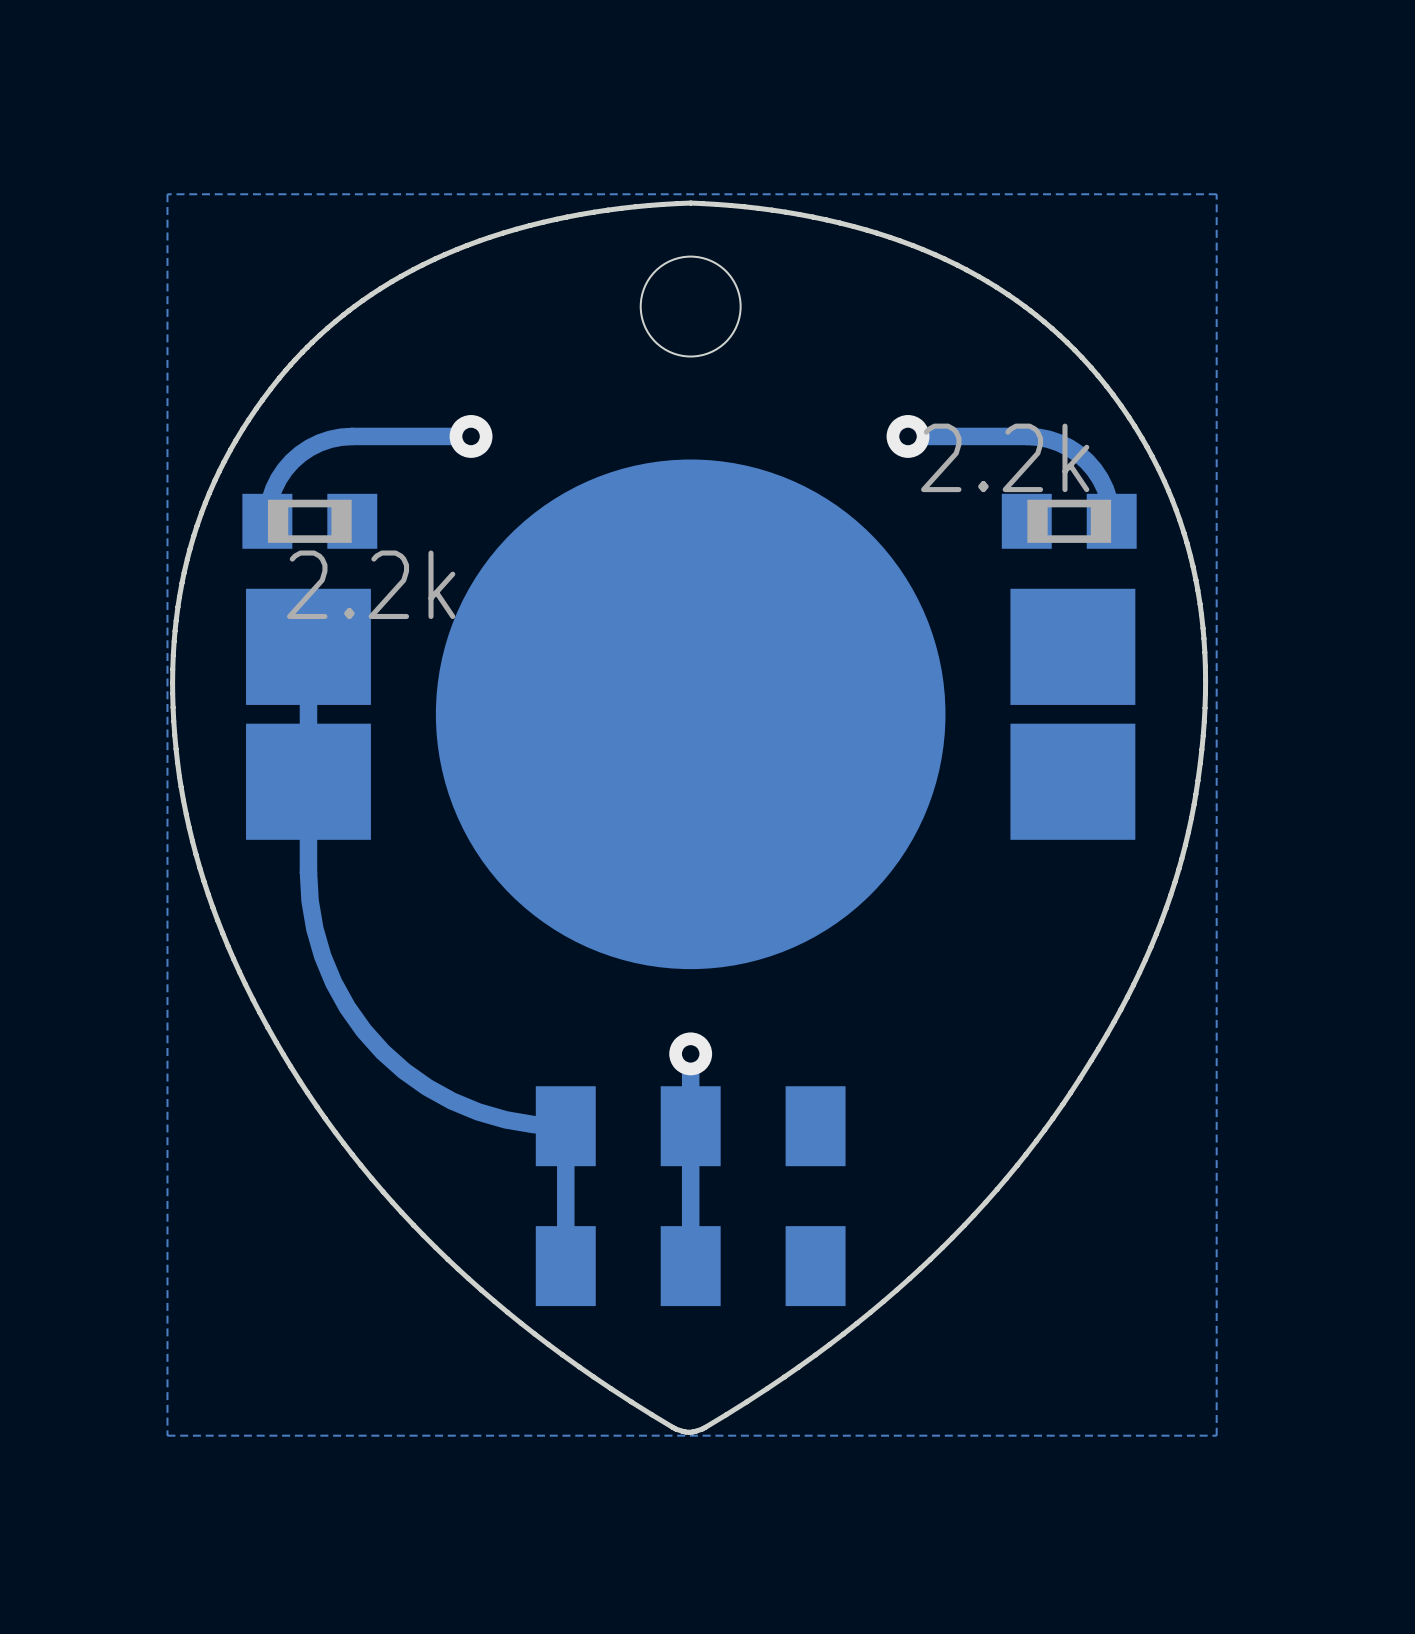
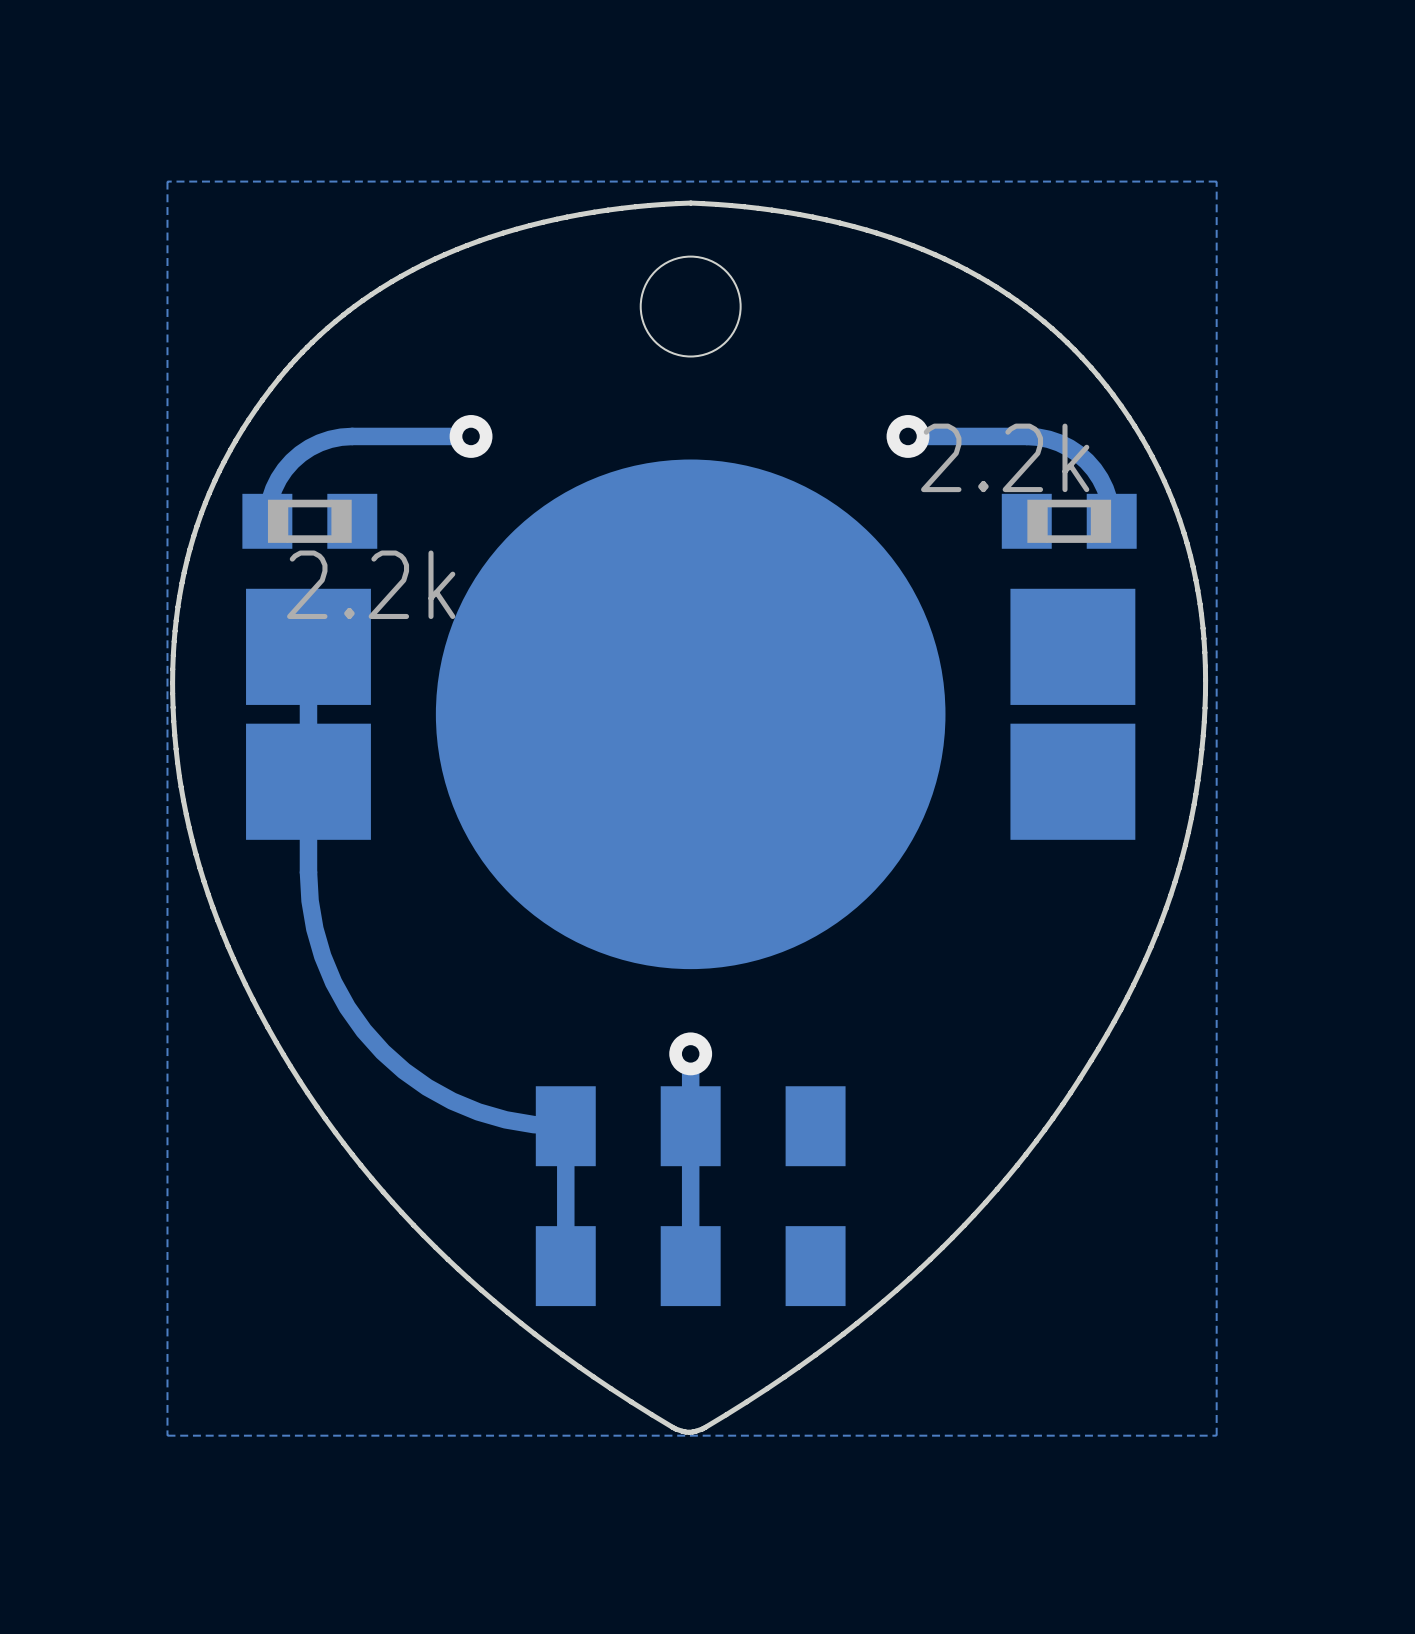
zone outline: (1216, 194) (167, 194) -> (1216, 194) (1216, 181) (167, 181) (167, 194)

